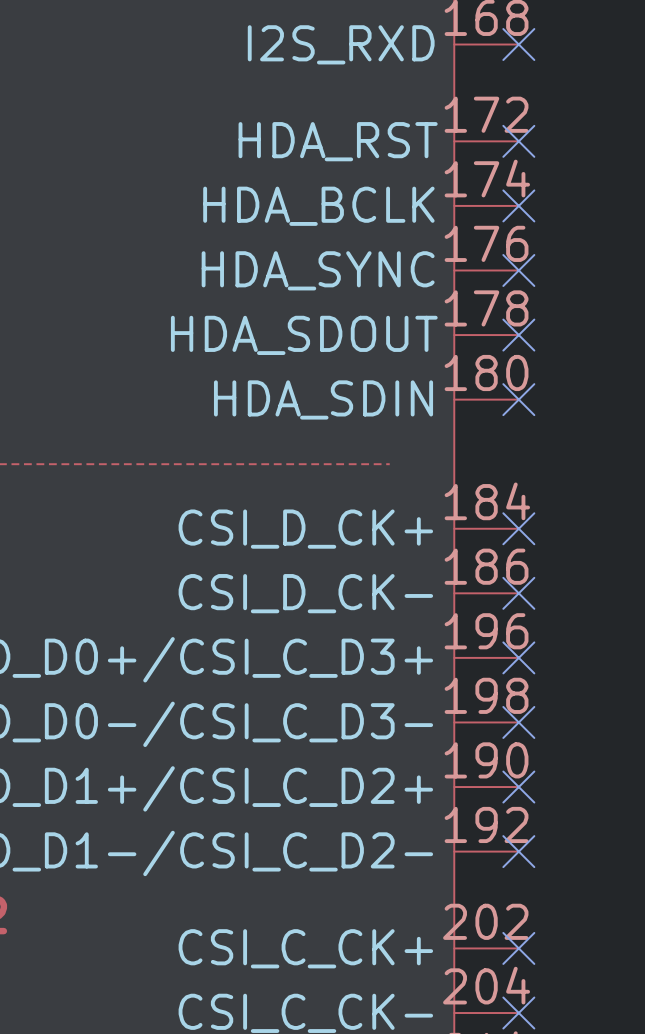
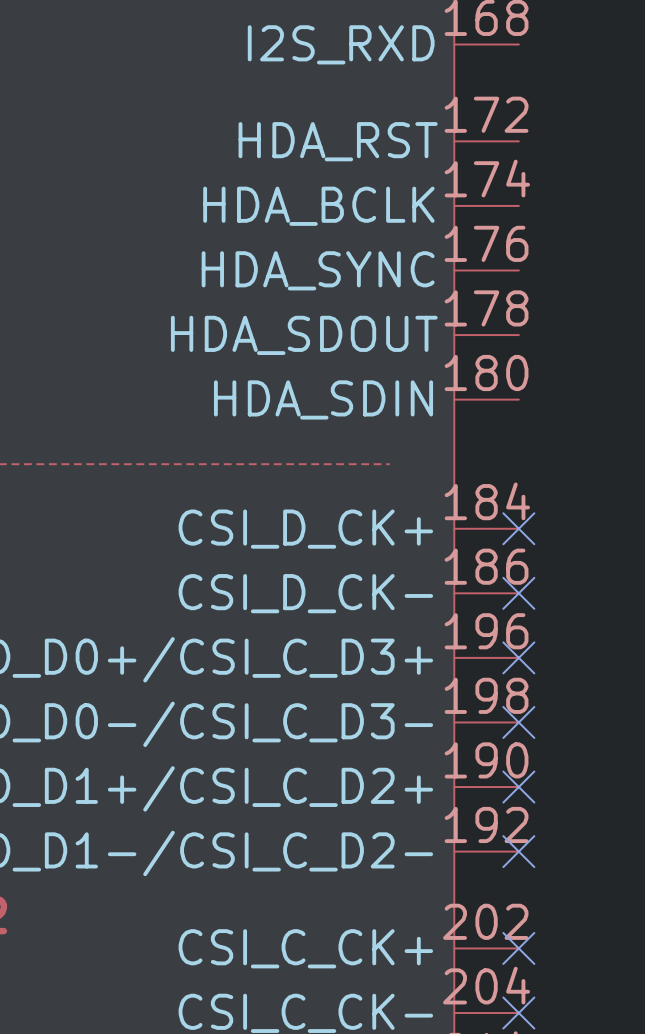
no-connect mark: (518, 44) -> none
no-connect mark: (518, 141) -> none
no-connect mark: (518, 205) -> none
no-connect mark: (518, 270) -> none
no-connect mark: (518, 335) -> none
no-connect mark: (518, 399) -> none

